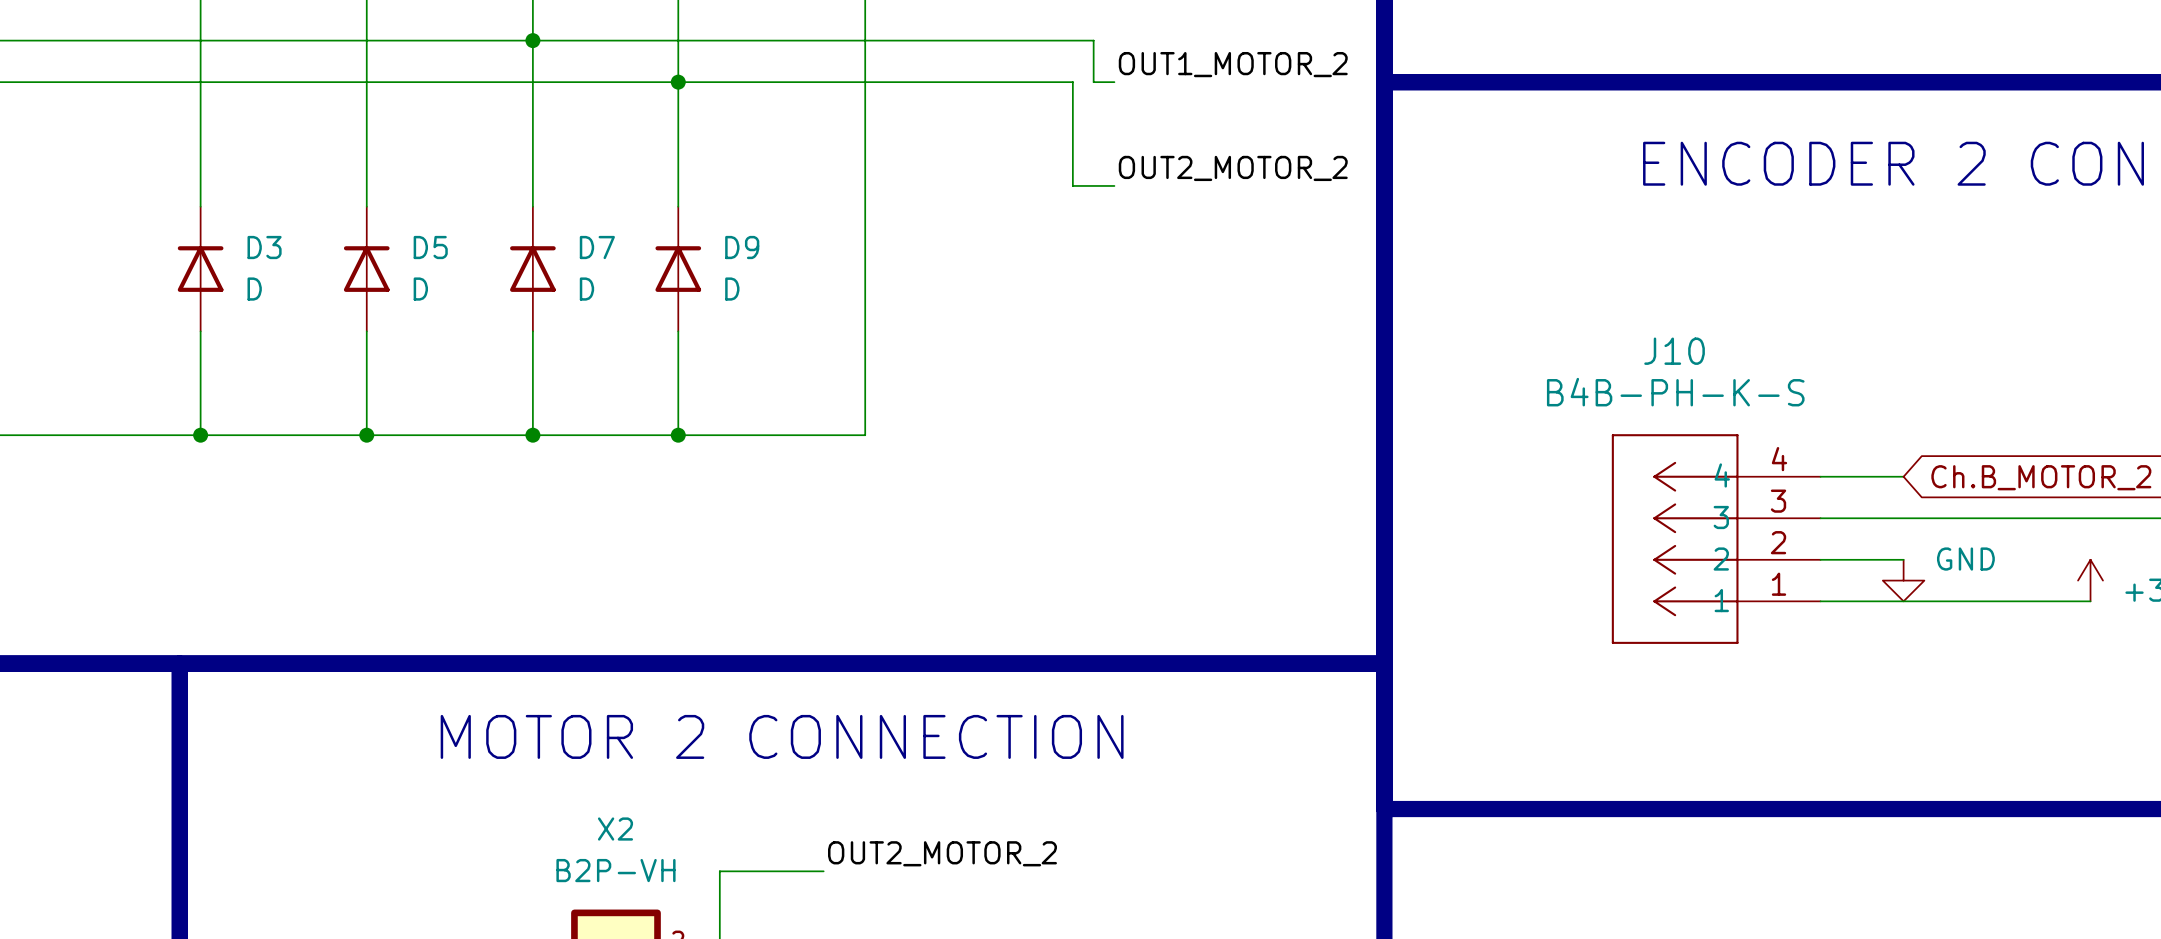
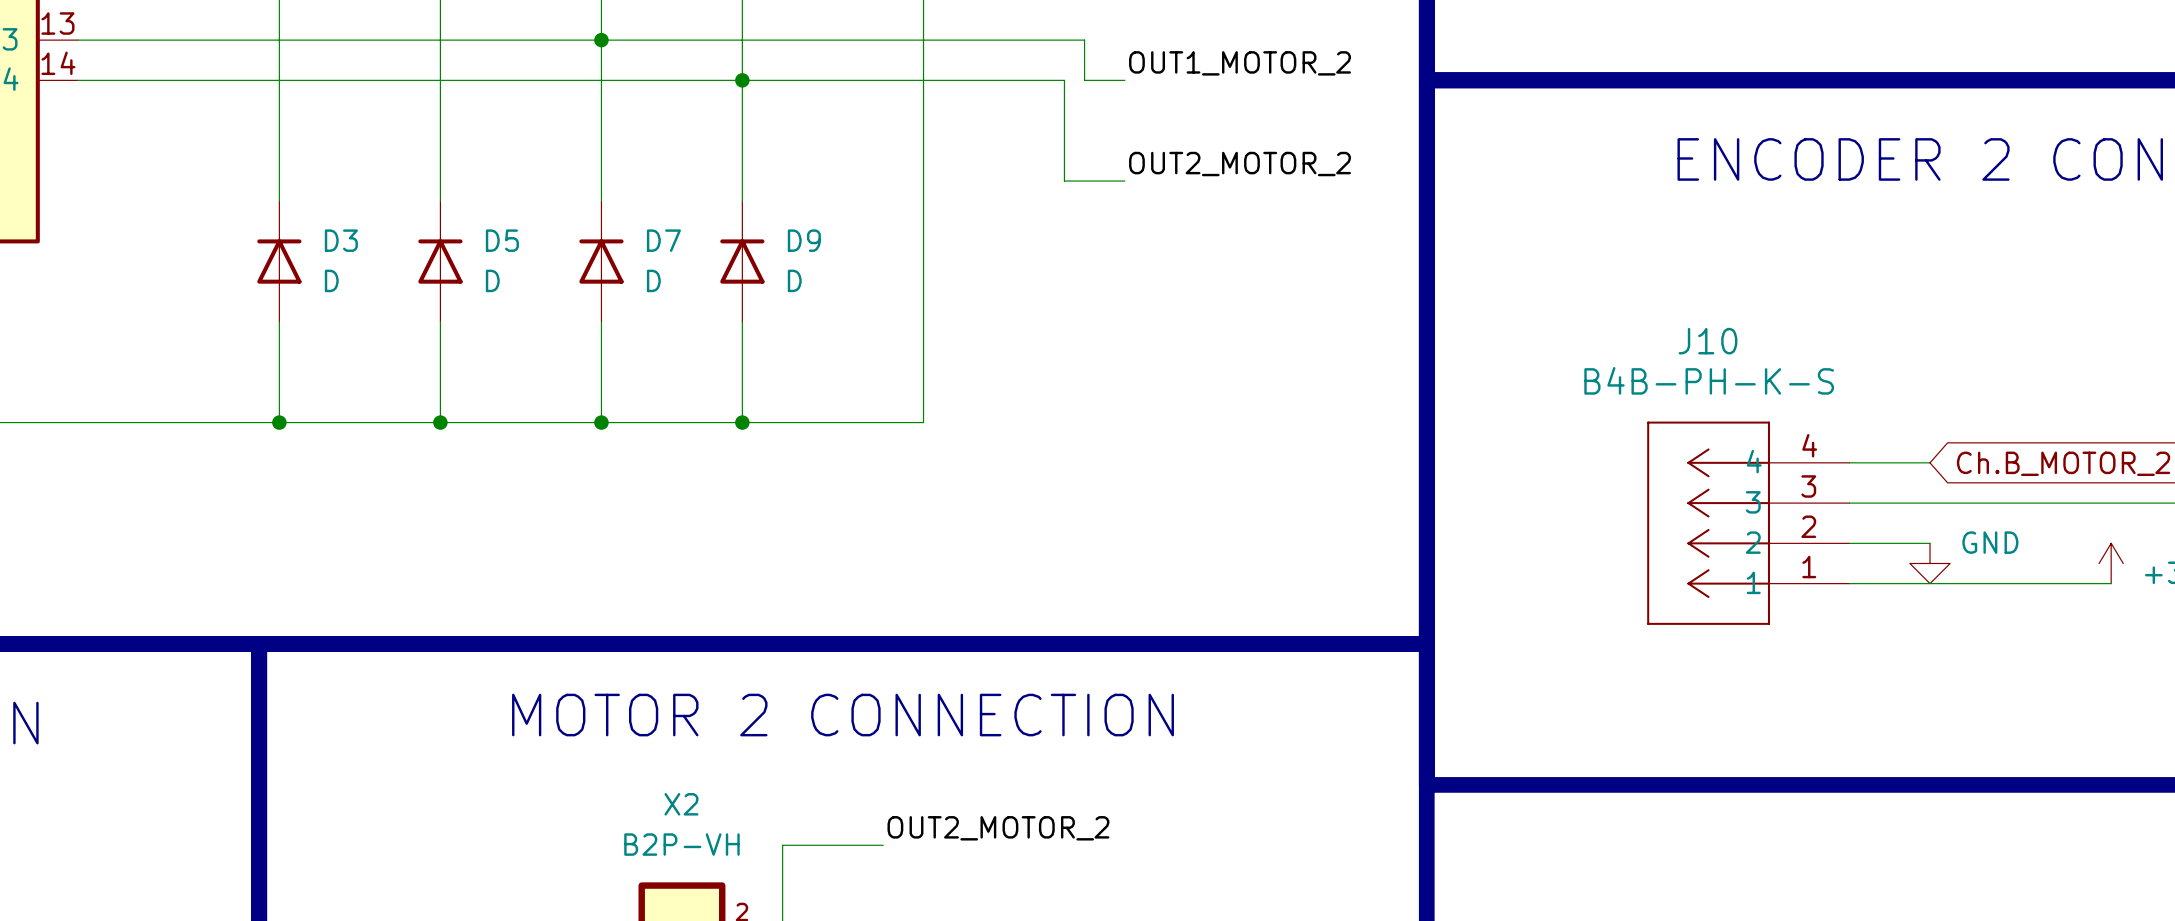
wire: (1031, 40) (1093, 40) (1093, 82) (1114, 82) -> none
label position: OUT1_MOTOR_2 (1233, 64) -> OUT1_MOTOR_2 (1240, 63)
wire: (1010, 82) (1031, 82) -> (1084, 40) (1084, 80)
wire: none -> (1064, 80) (1064, 181) (1124, 181)
wire: (1072, 82) (1072, 185) (1114, 185) -> none
label position: OUT2_MOTOR_2 (1233, 168) -> OUT2_MOTOR_2 (1240, 164)

